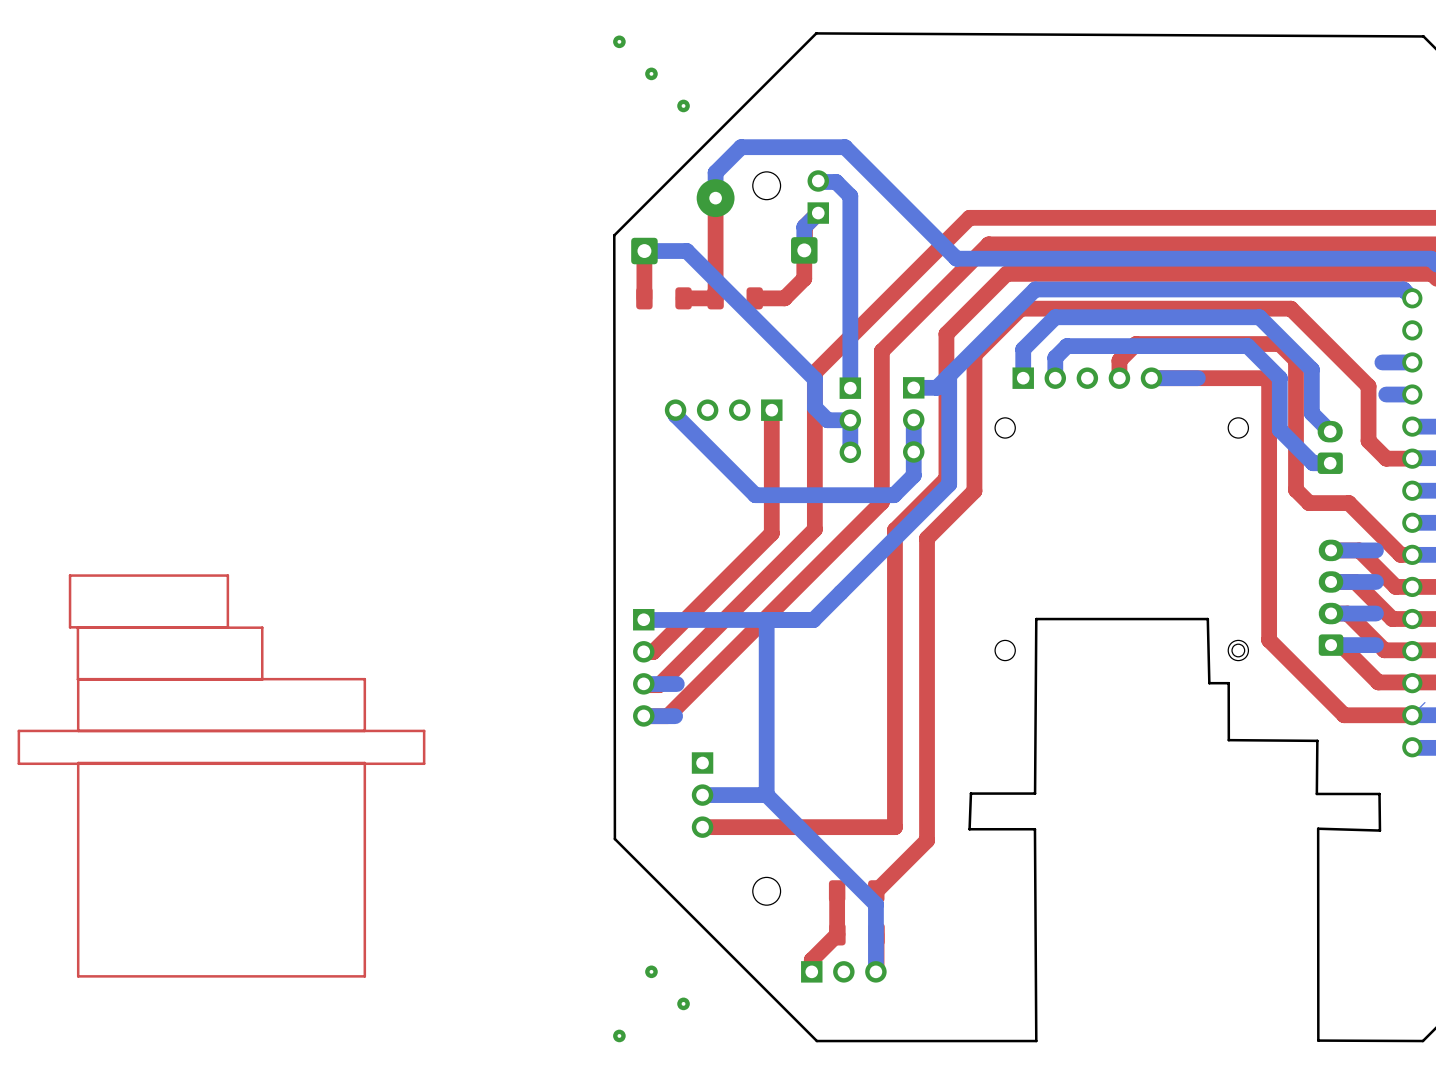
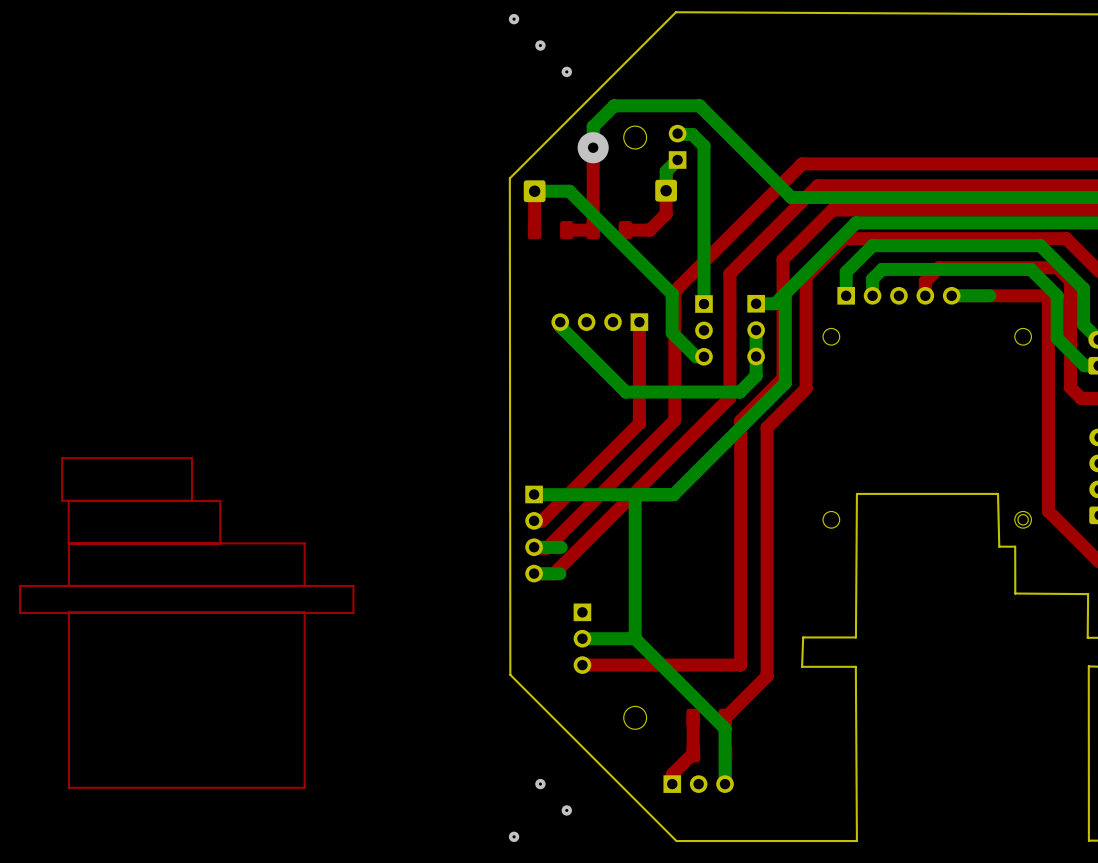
bottom track: (811, 375) (814, 379) (814, 407) (827, 420) (850, 420) (850, 452) -> (672, 293) (672, 332) (696, 356) (703, 356)

